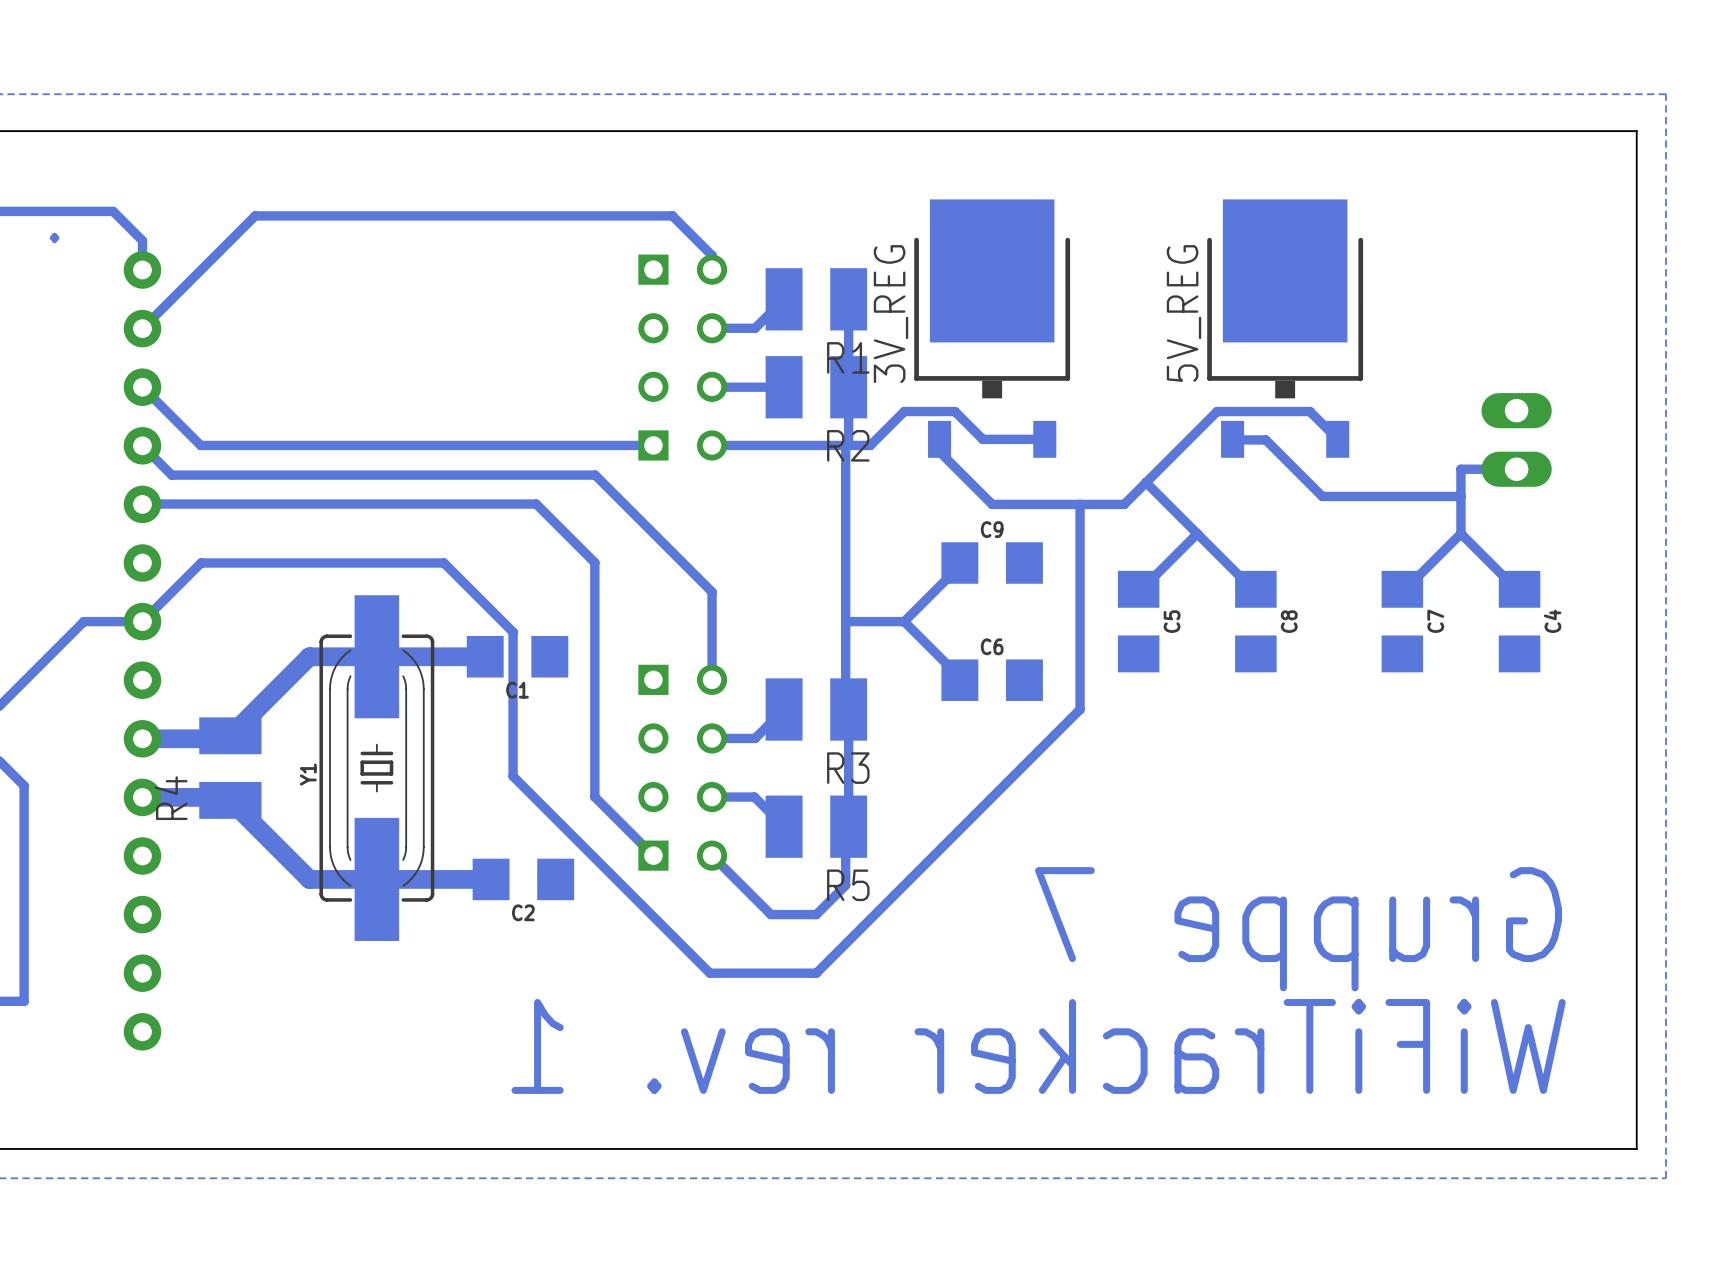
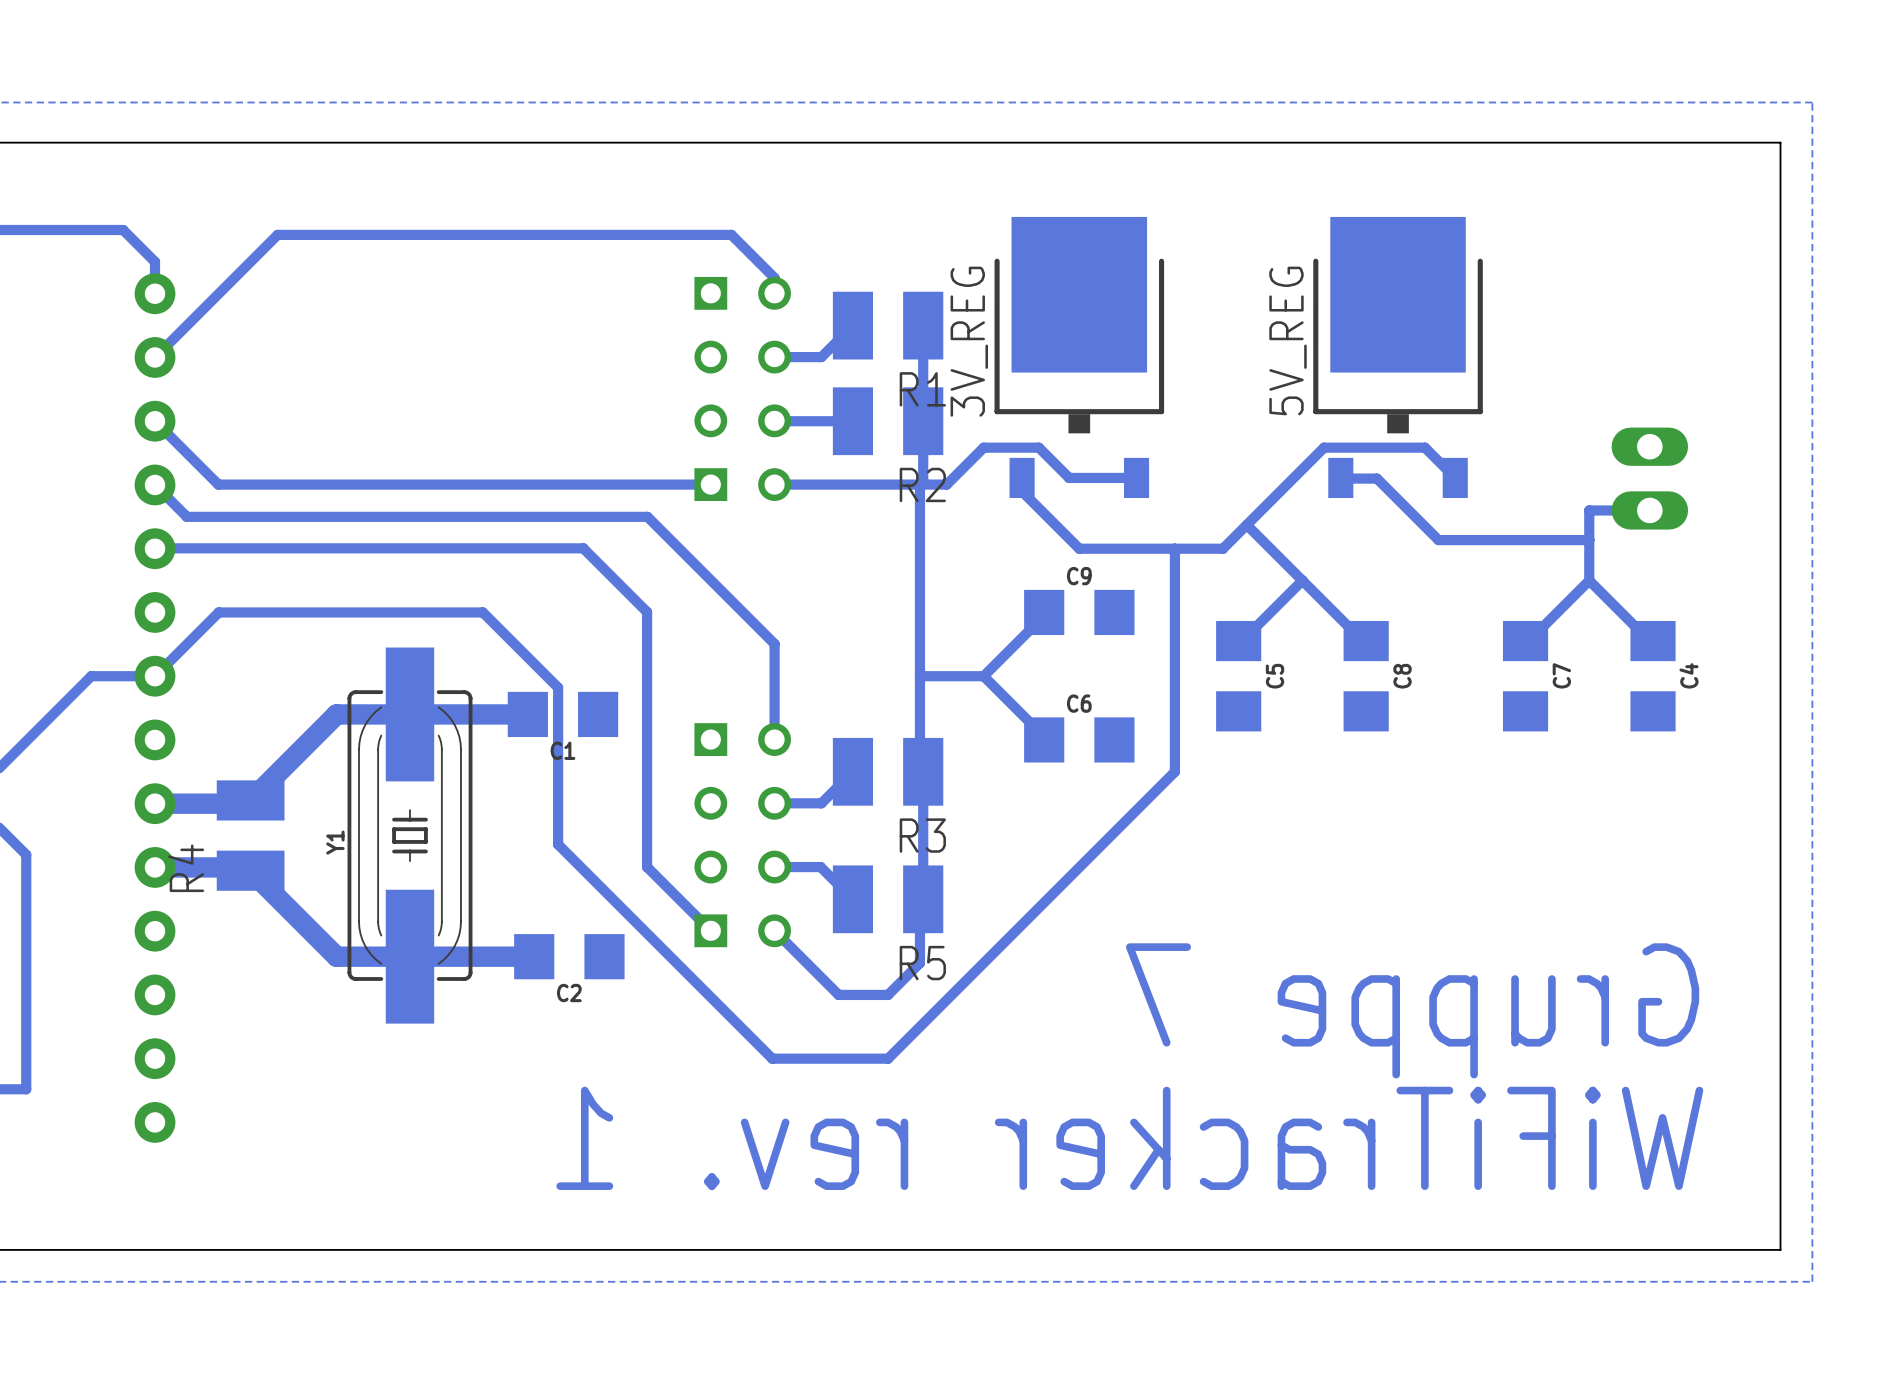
text: . (54, 237) -> none

